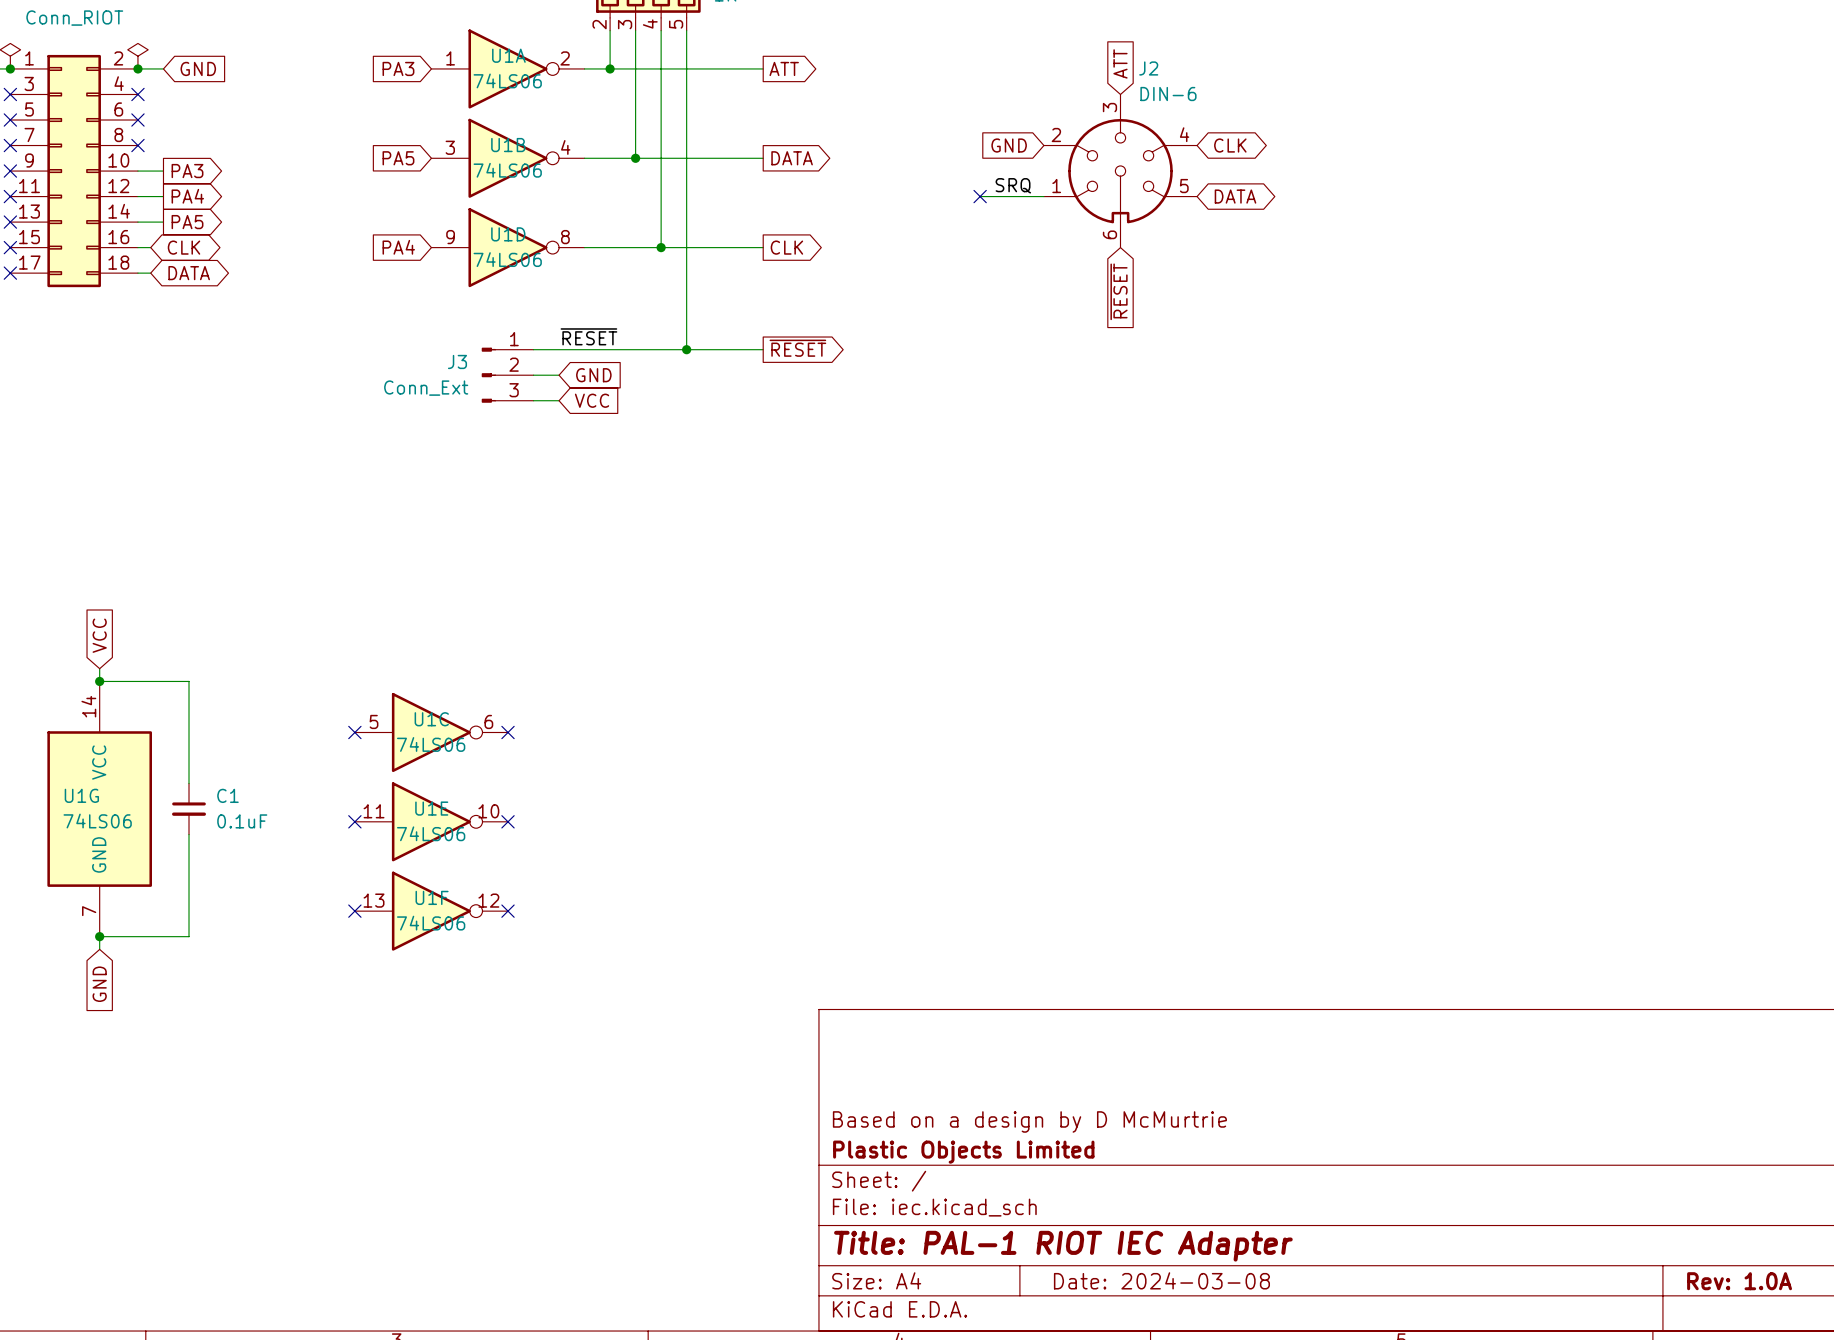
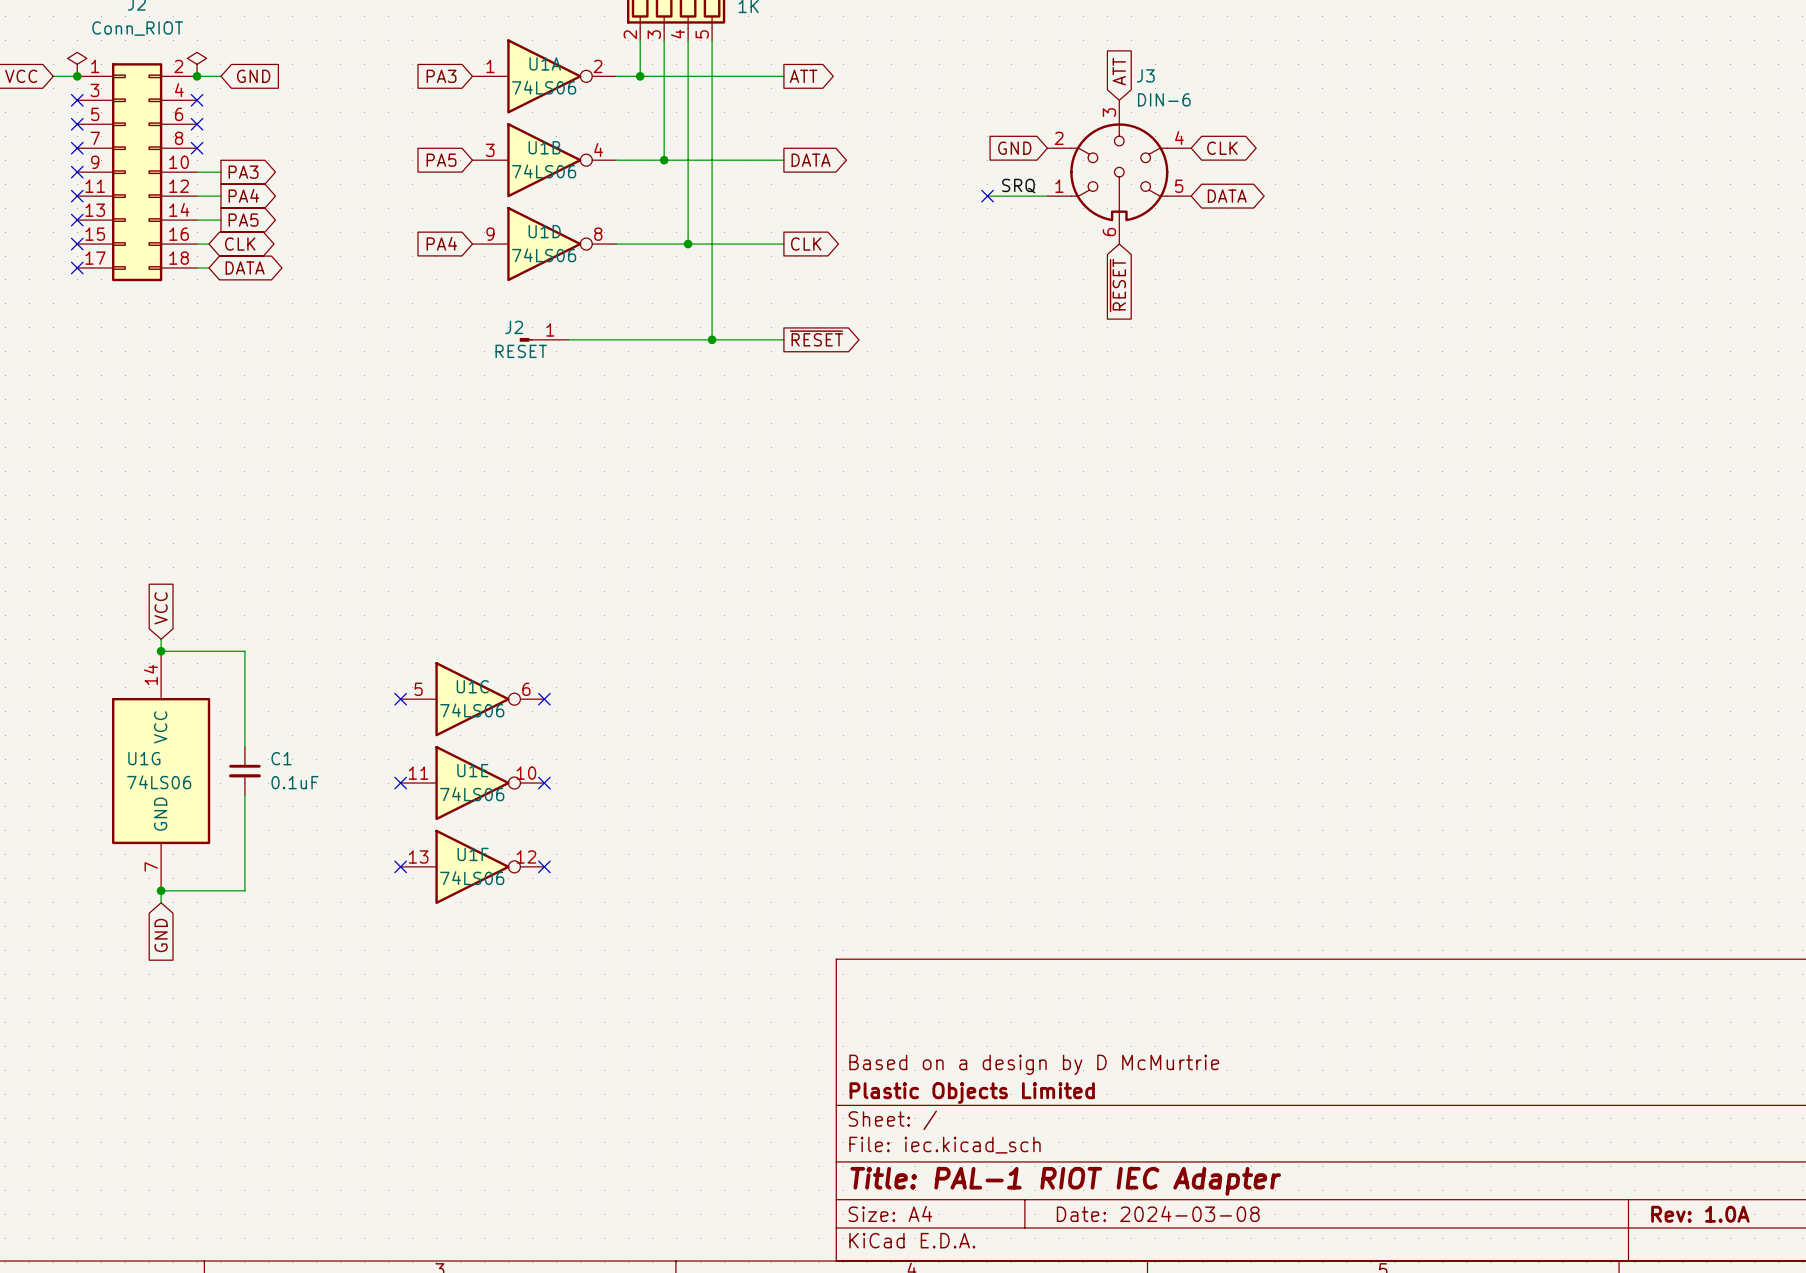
J2 name: J2 (1148, 68) -> J3 (1145, 75)
label: ~{RESET} (588, 336) -> none
J2: none -> RESET (544, 339)
J3: Conn_Ext (507, 375) -> none
wire: (533, 375) (559, 375) -> none
global label: GND (593, 375) -> none
wire: (533, 400) (559, 400) -> none
global label: VCC (592, 400) -> none

